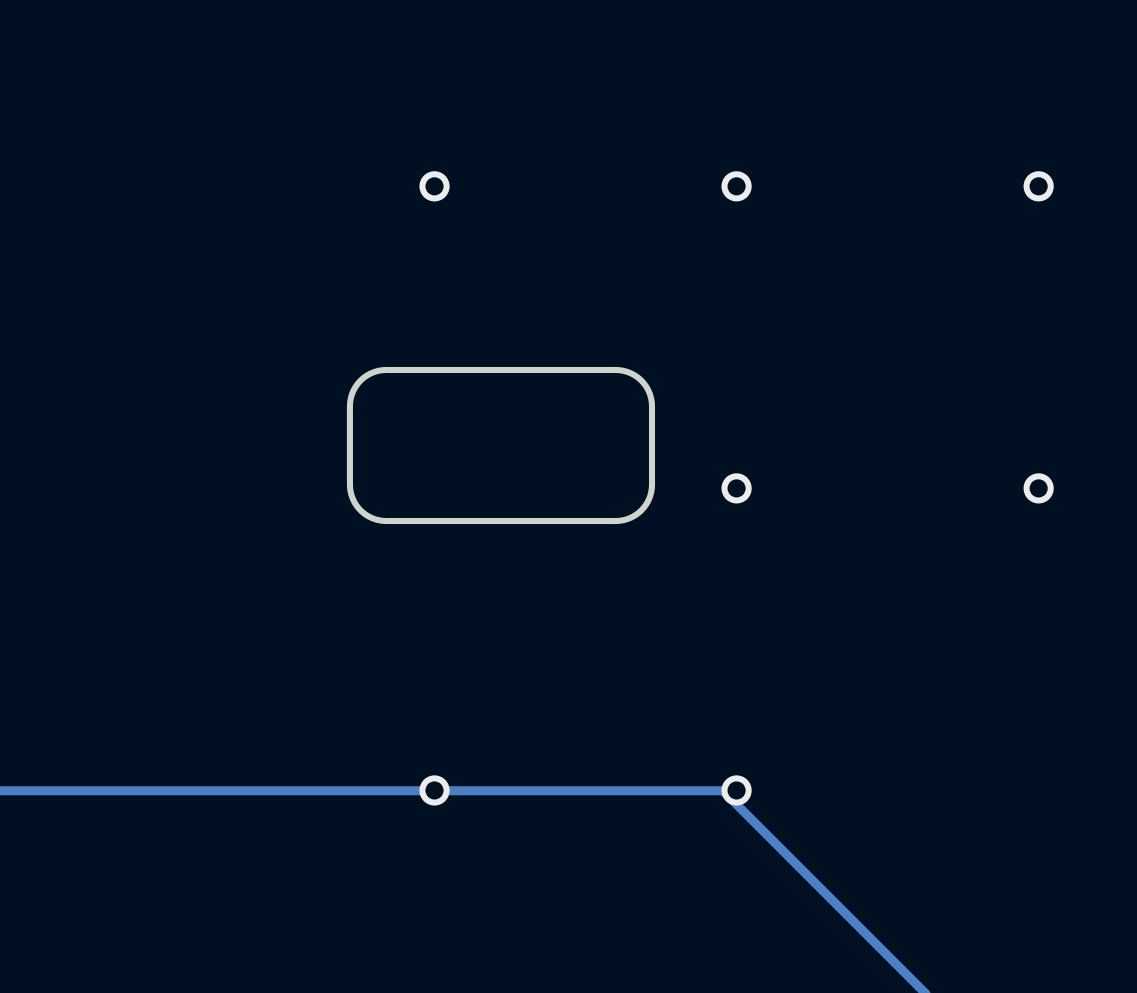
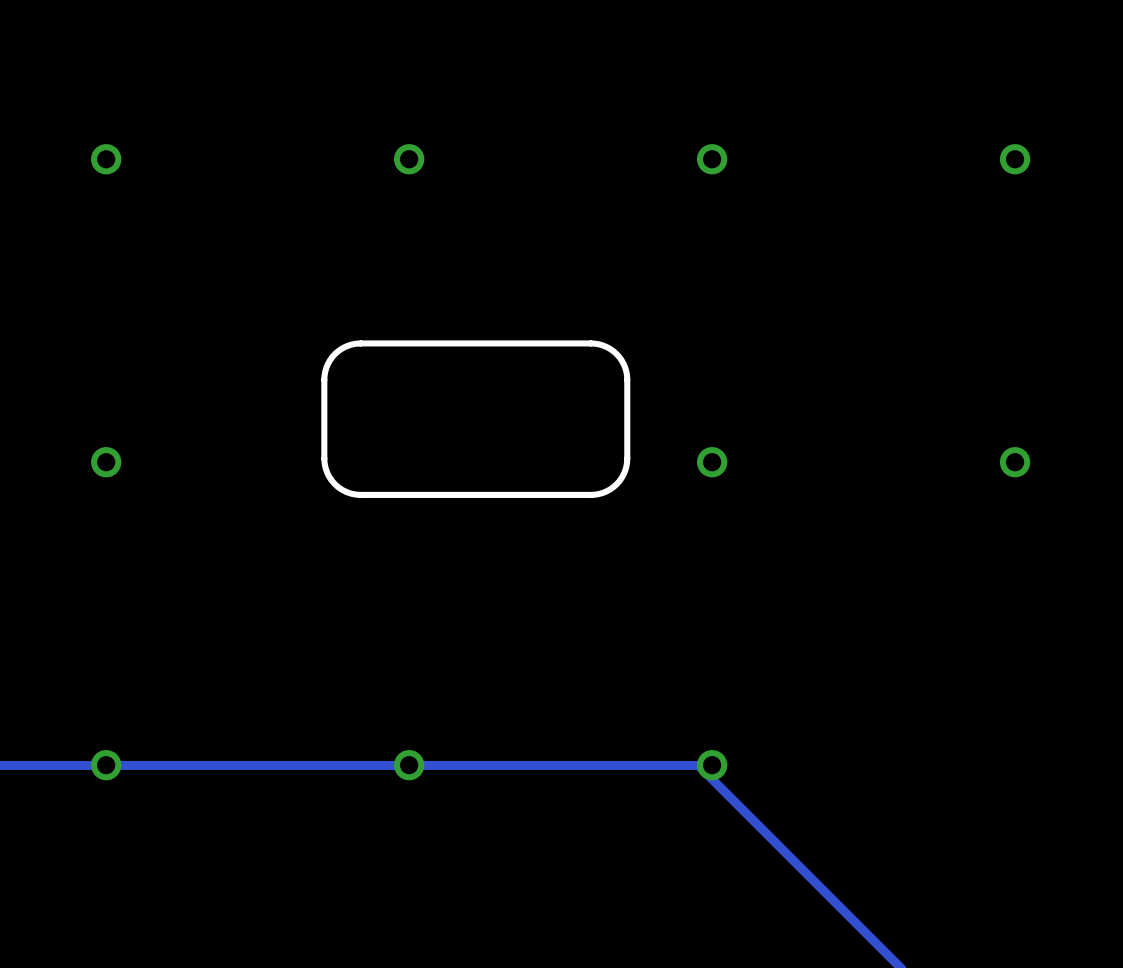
via: none -> (106, 159)
via: none -> (106, 462)
via: none -> (106, 765)

